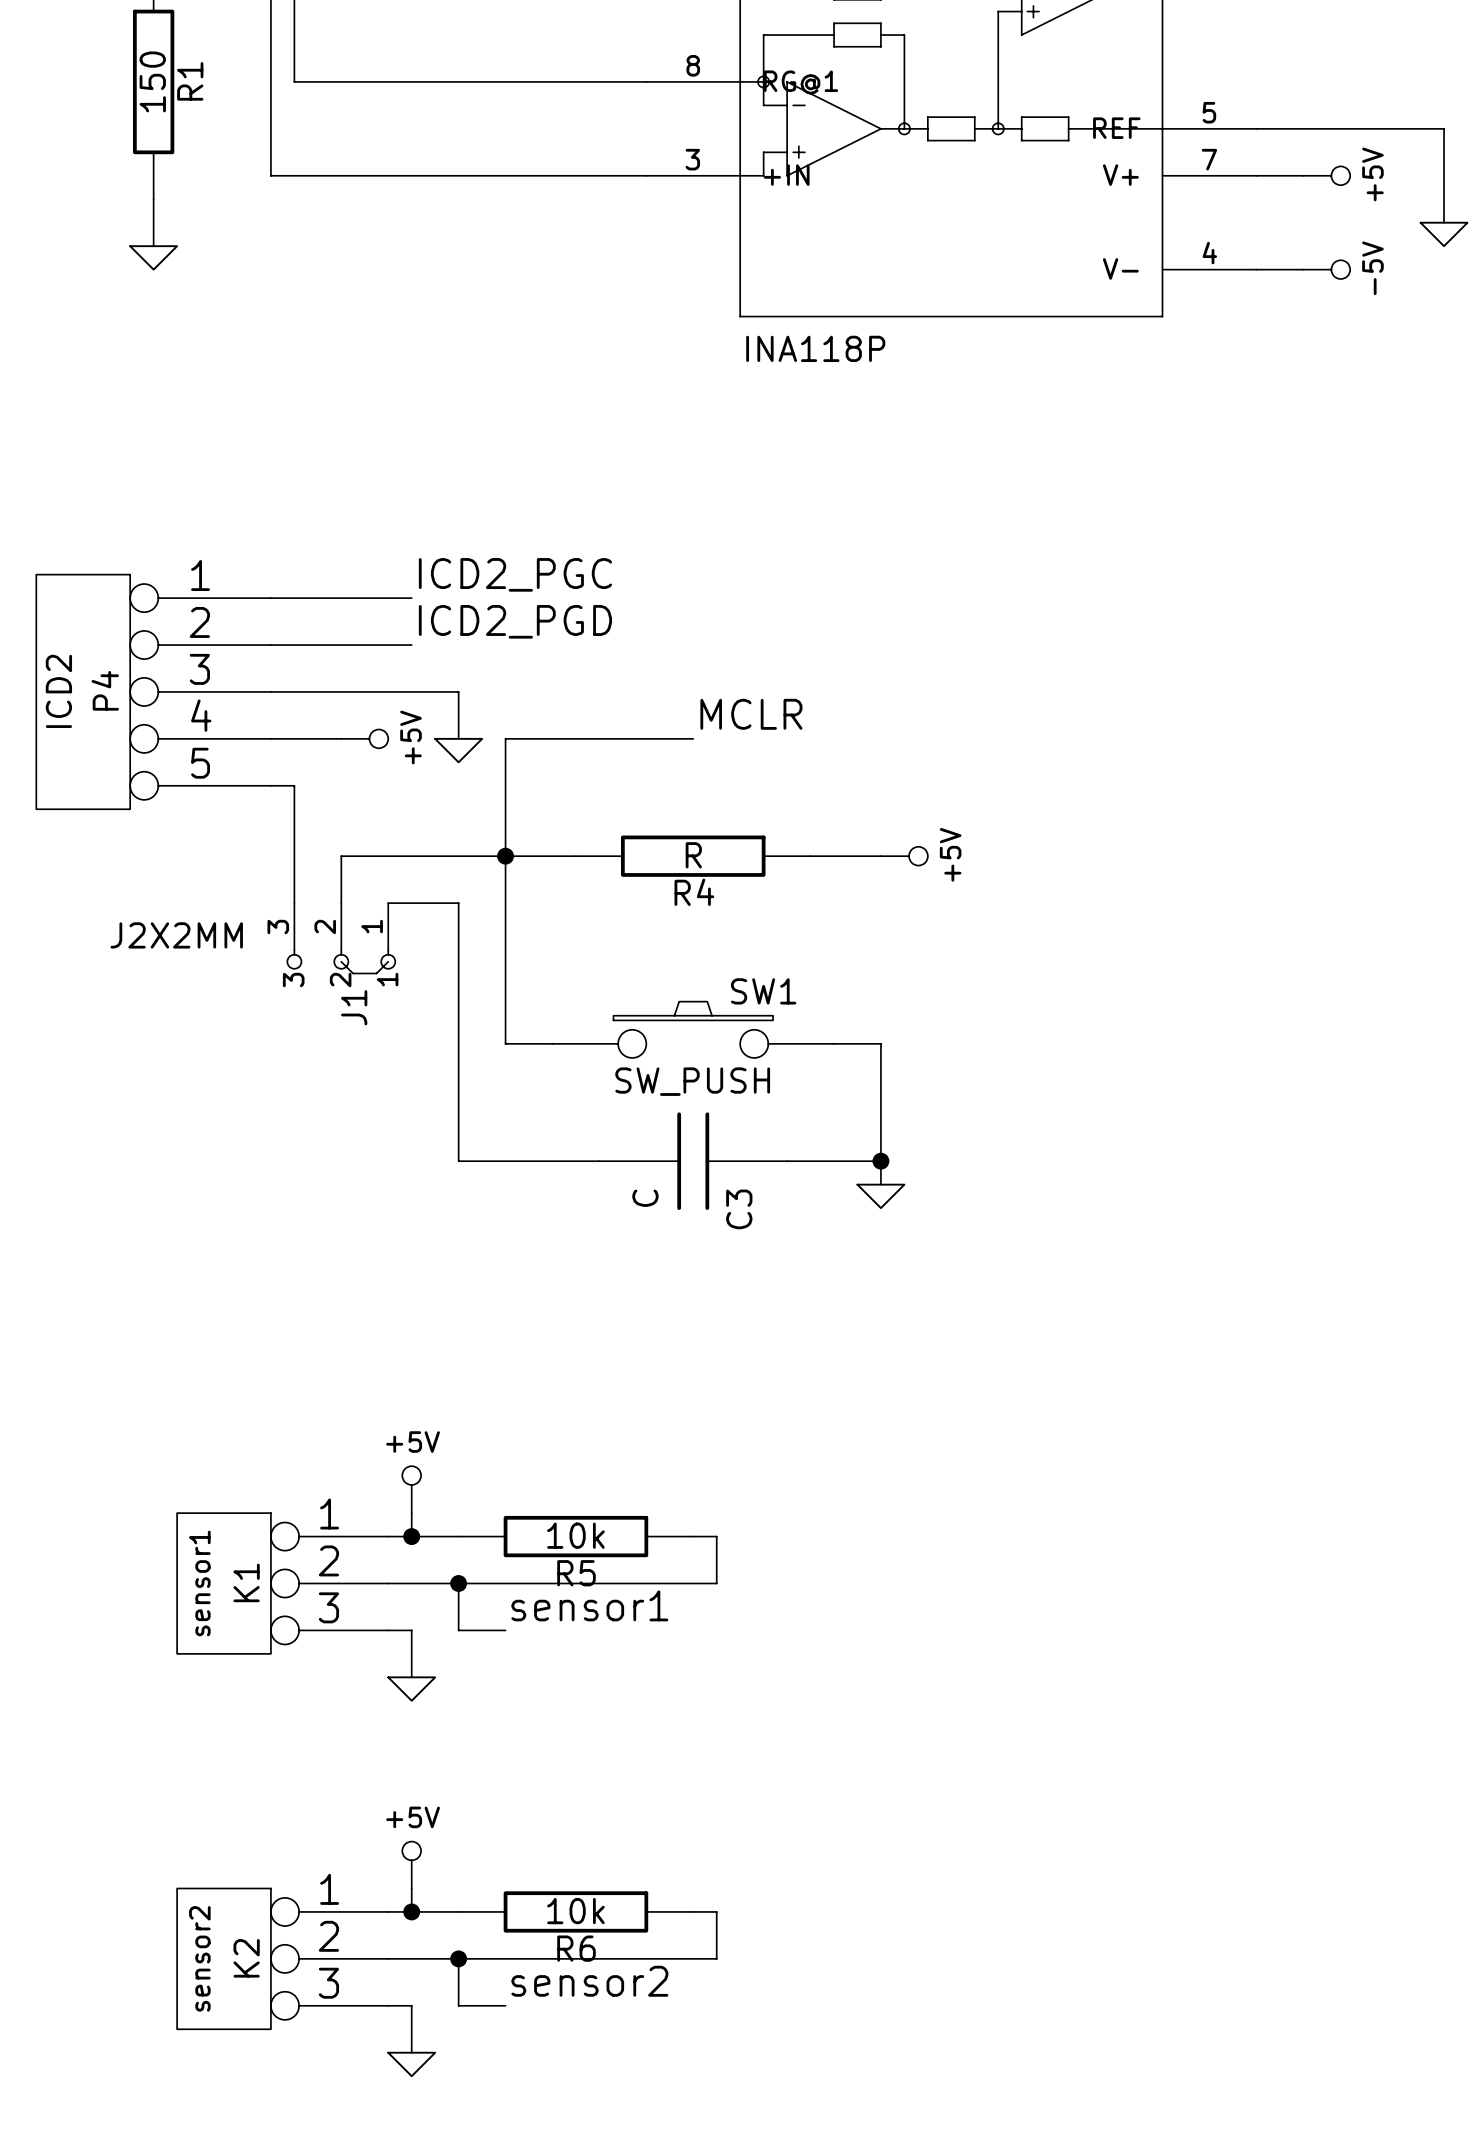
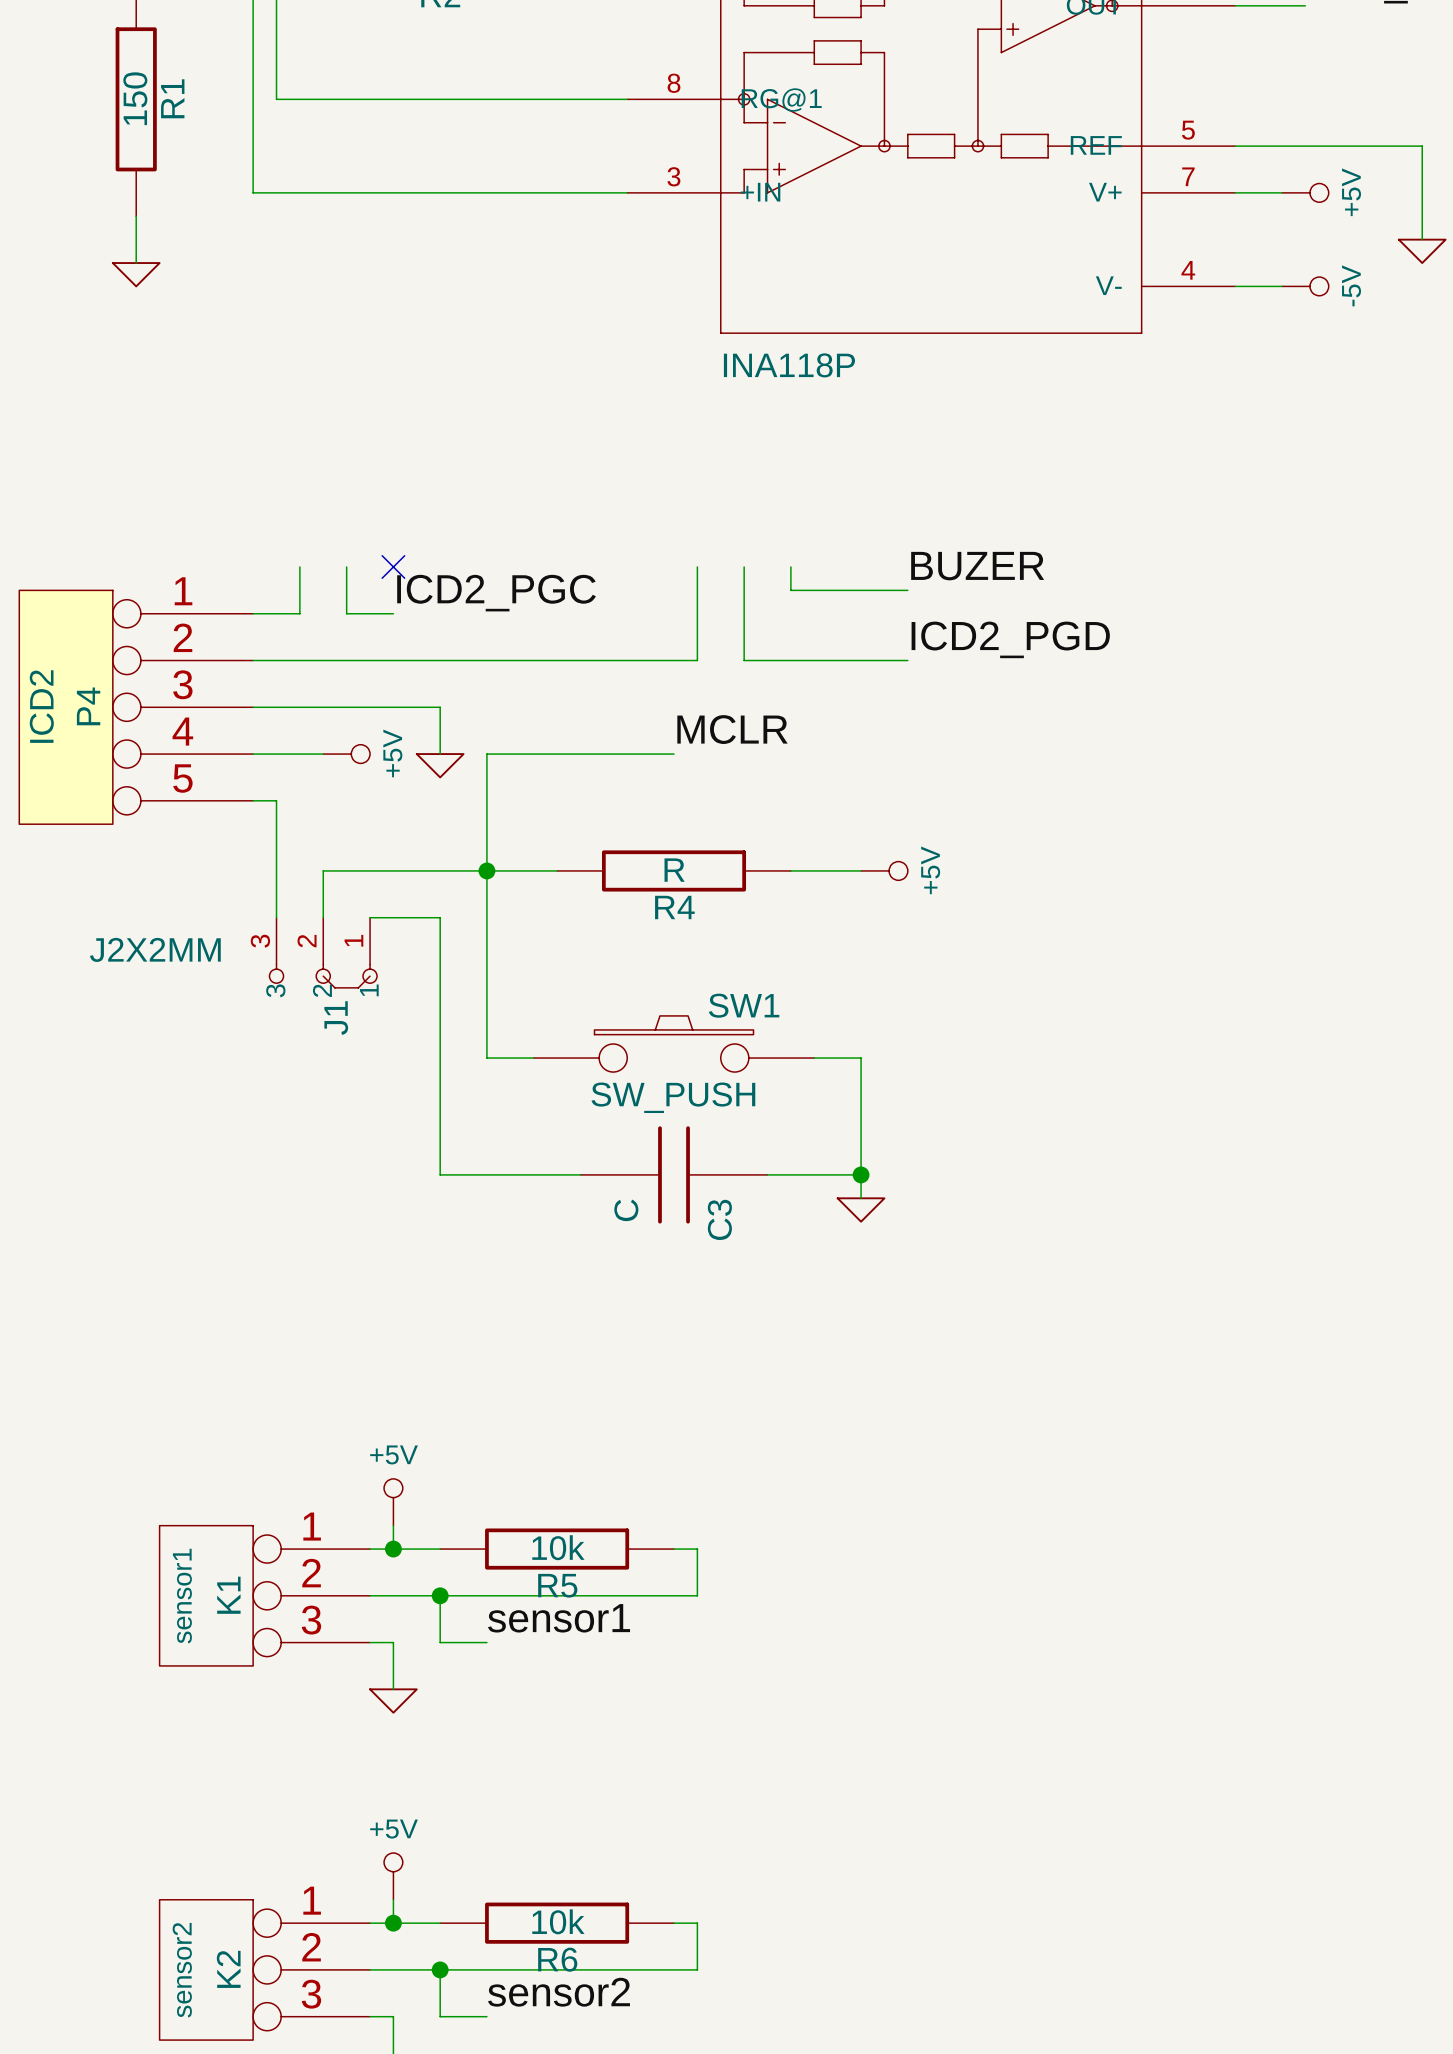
label: none -> BUZER (977, 566)
wire: none -> (346, 566) (346, 613)
no-connect mark: none -> (393, 566)
wire: none -> (697, 566) (697, 660) (393, 660)
wire: none -> (744, 566) (744, 660) (907, 660)
wire: none -> (790, 566) (790, 590) (907, 590)
wire: (317, 598) (364, 598) -> (299, 613) (299, 566)
label: ICD2_PGD (515, 621) -> none
label: none -> ICD2_PGD (1010, 639)

